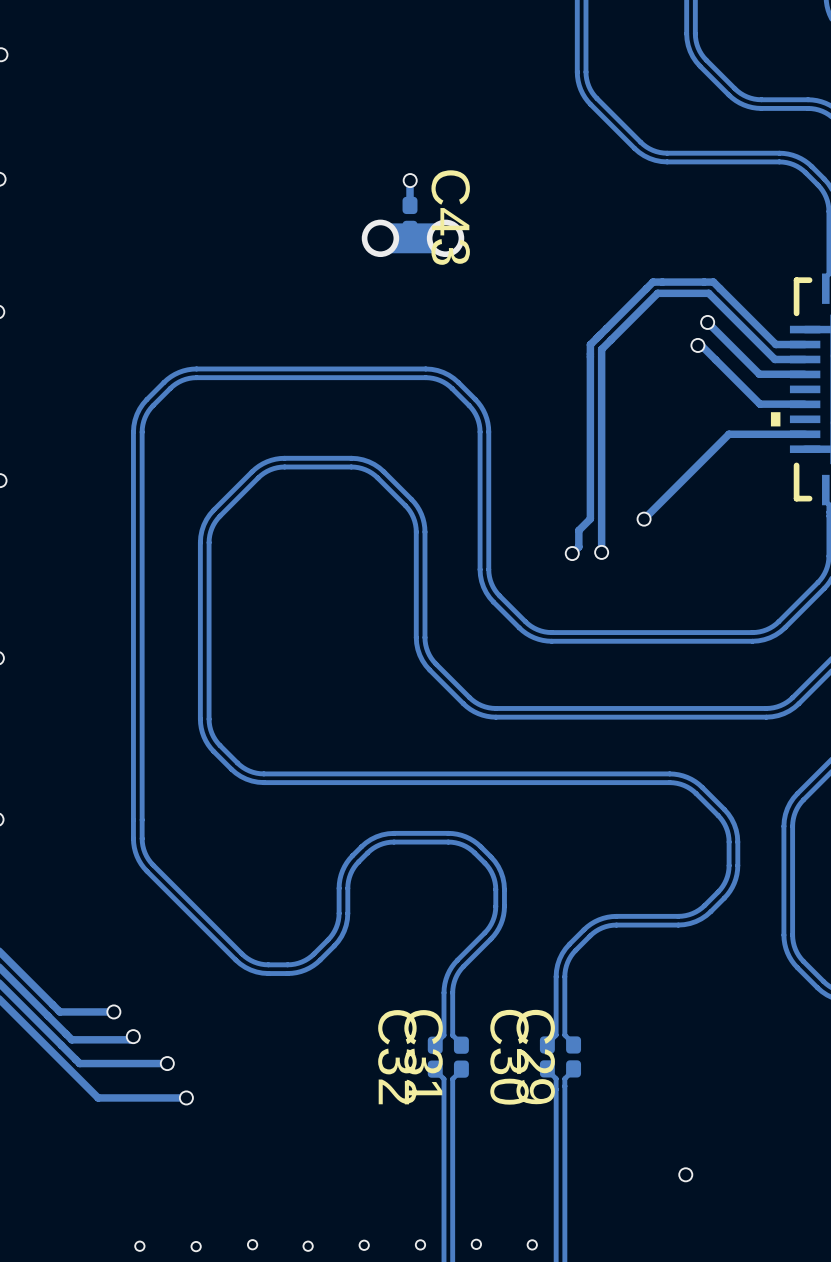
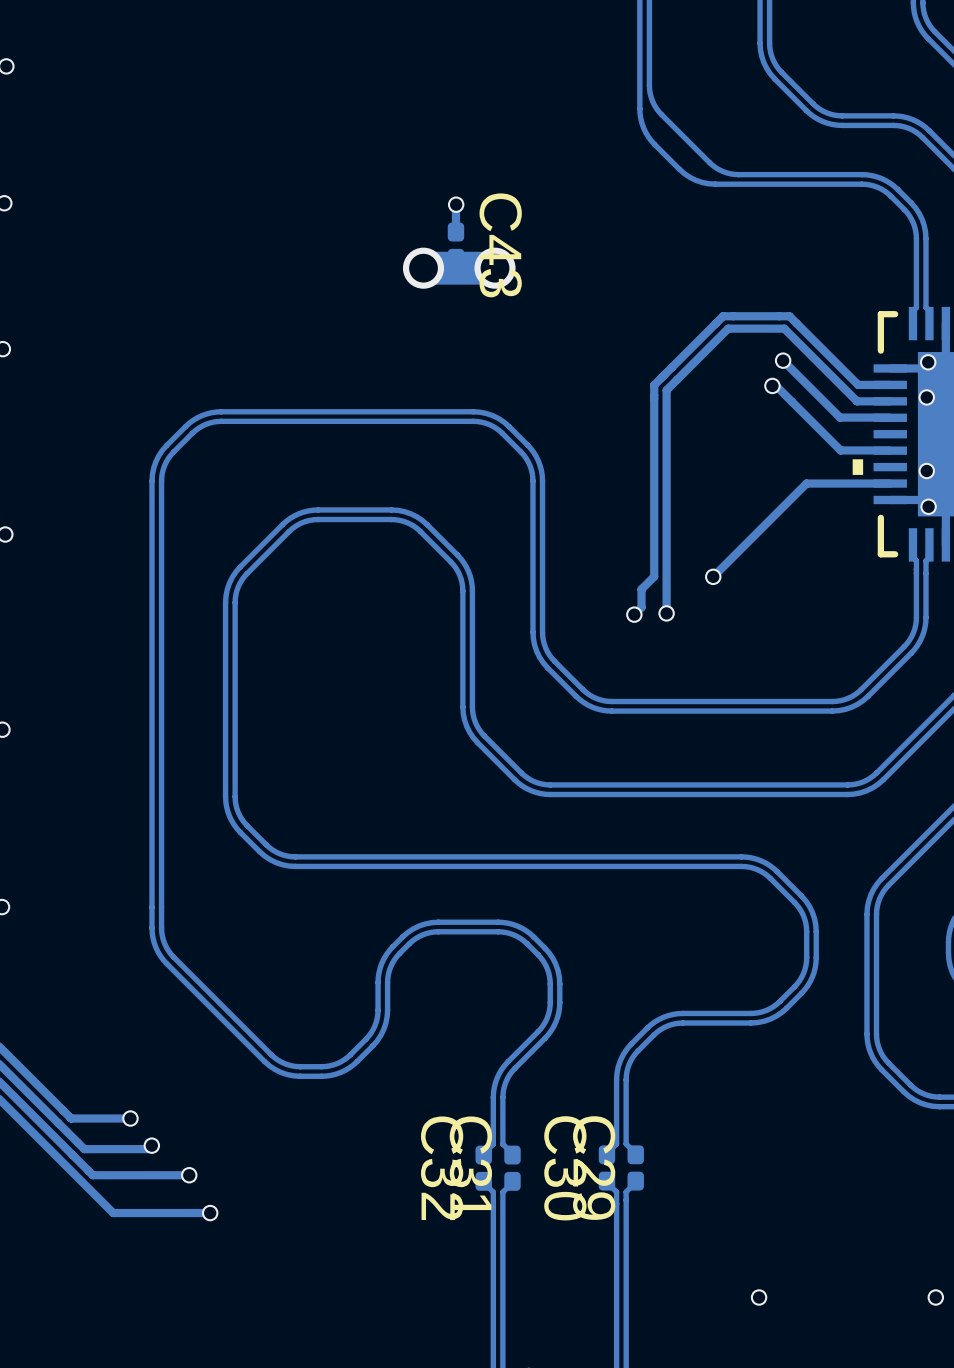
track: (577, 72) (579, 85) (587, 101) (634, 148) (649, 158) (667, 161) -> (639, 85) (640, 113) (643, 128) (651, 140) (679, 169) (689, 177) (702, 182) (738, 184)

